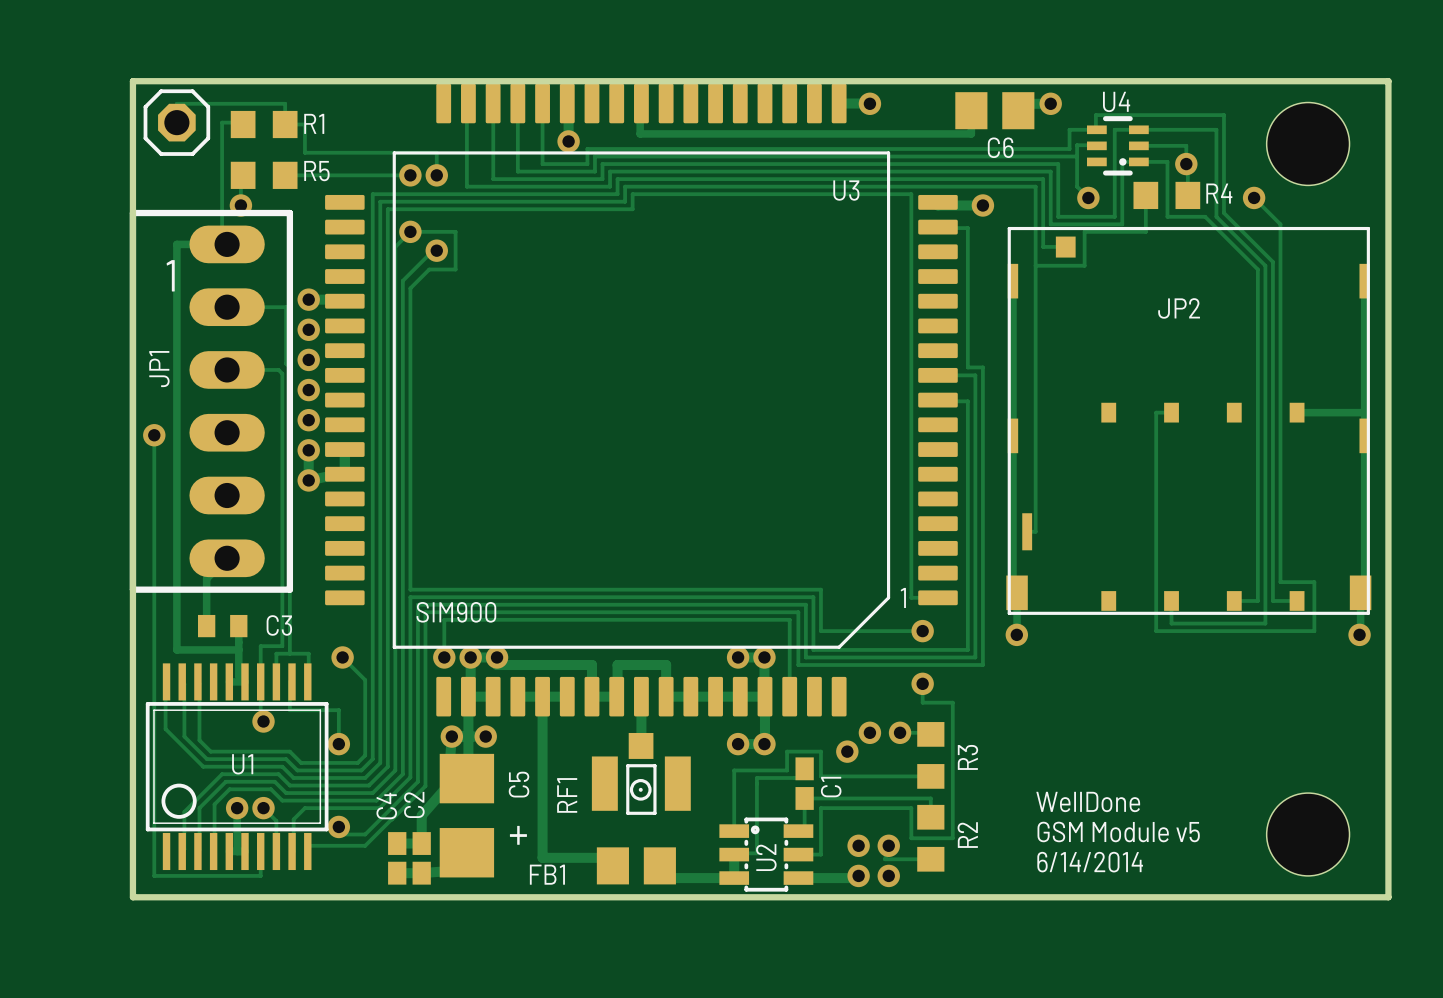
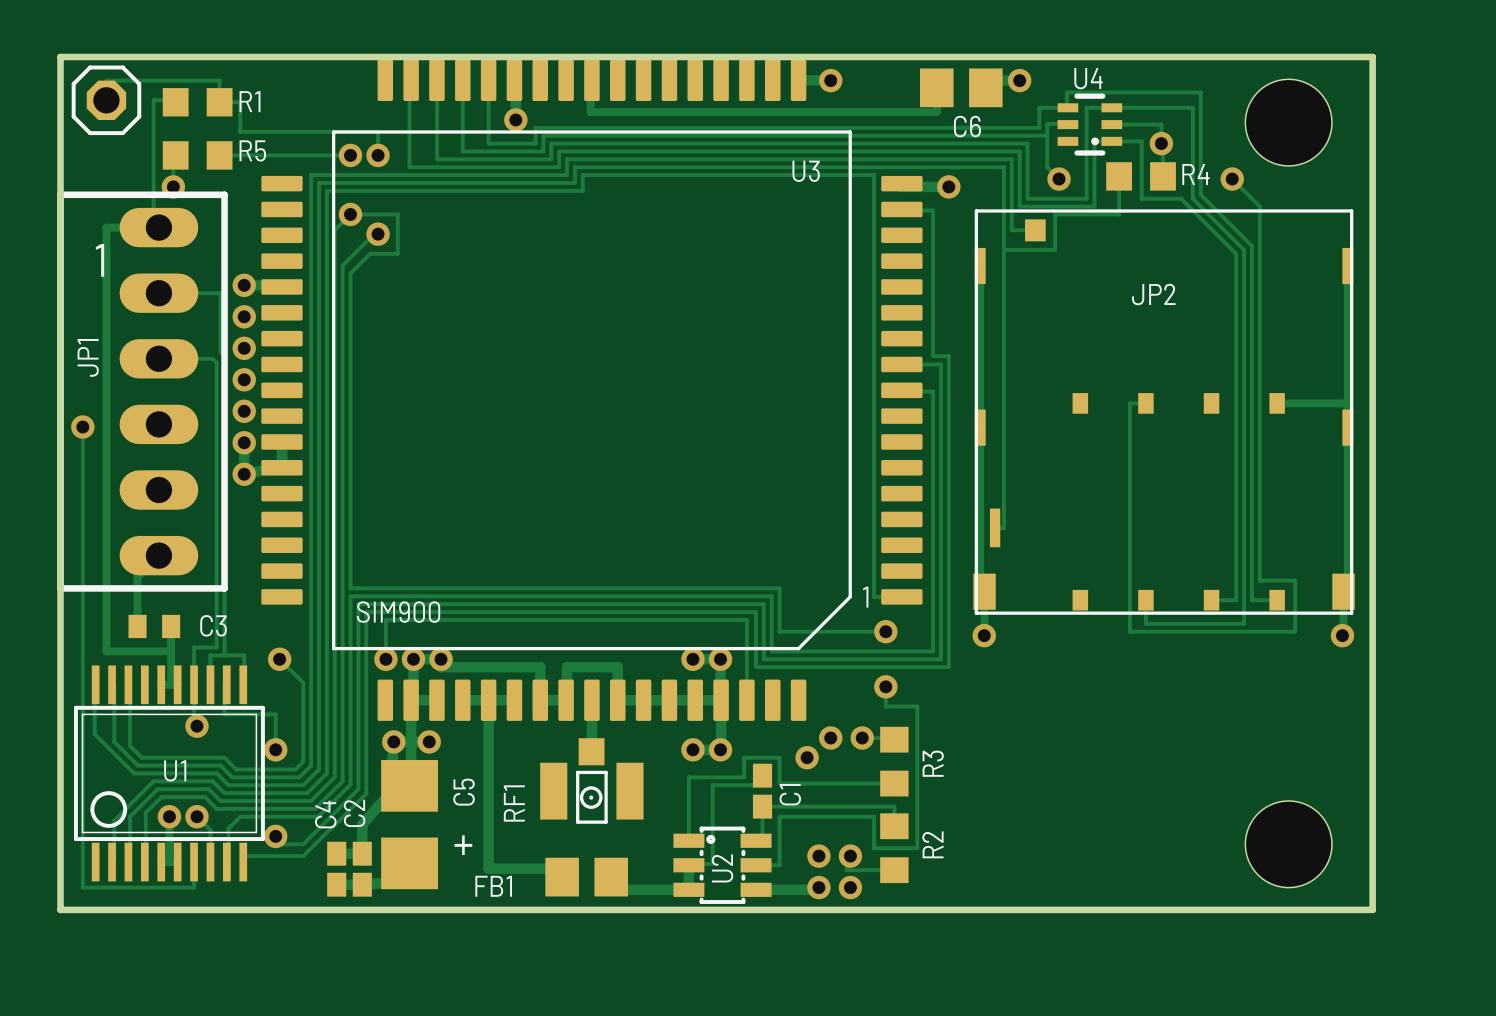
text: WellDone (1088, 801) -> none
text: GSM Module v5 (1118, 832) -> none
text: 6/14/2014 (1090, 862) -> none

